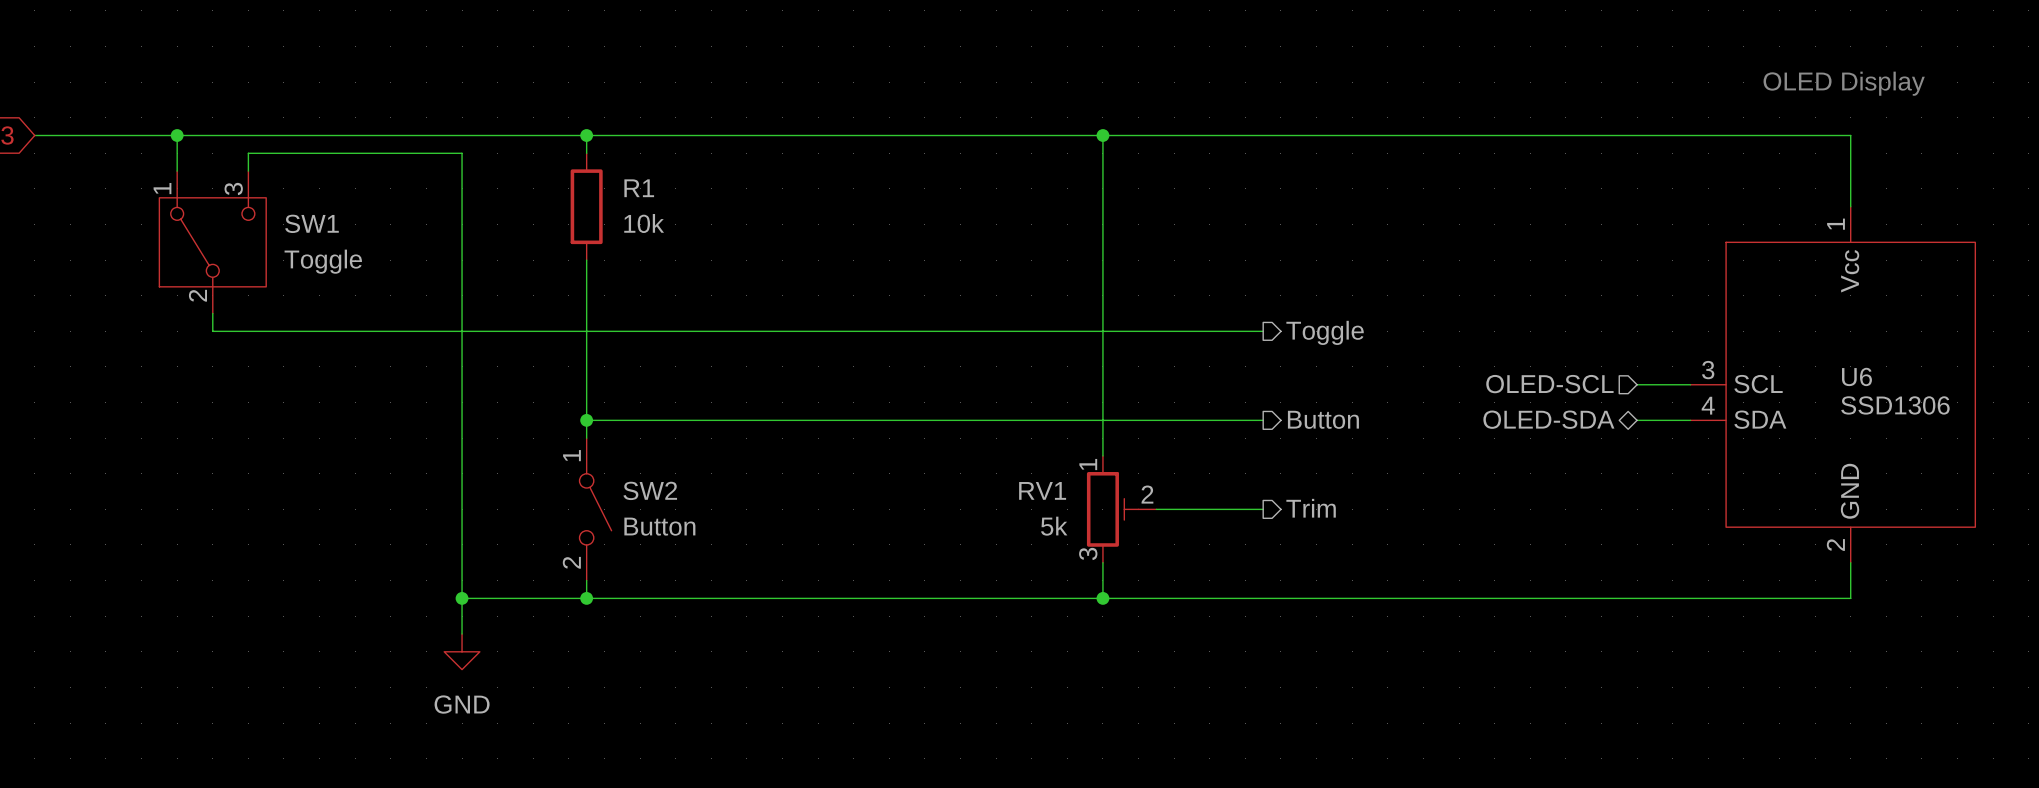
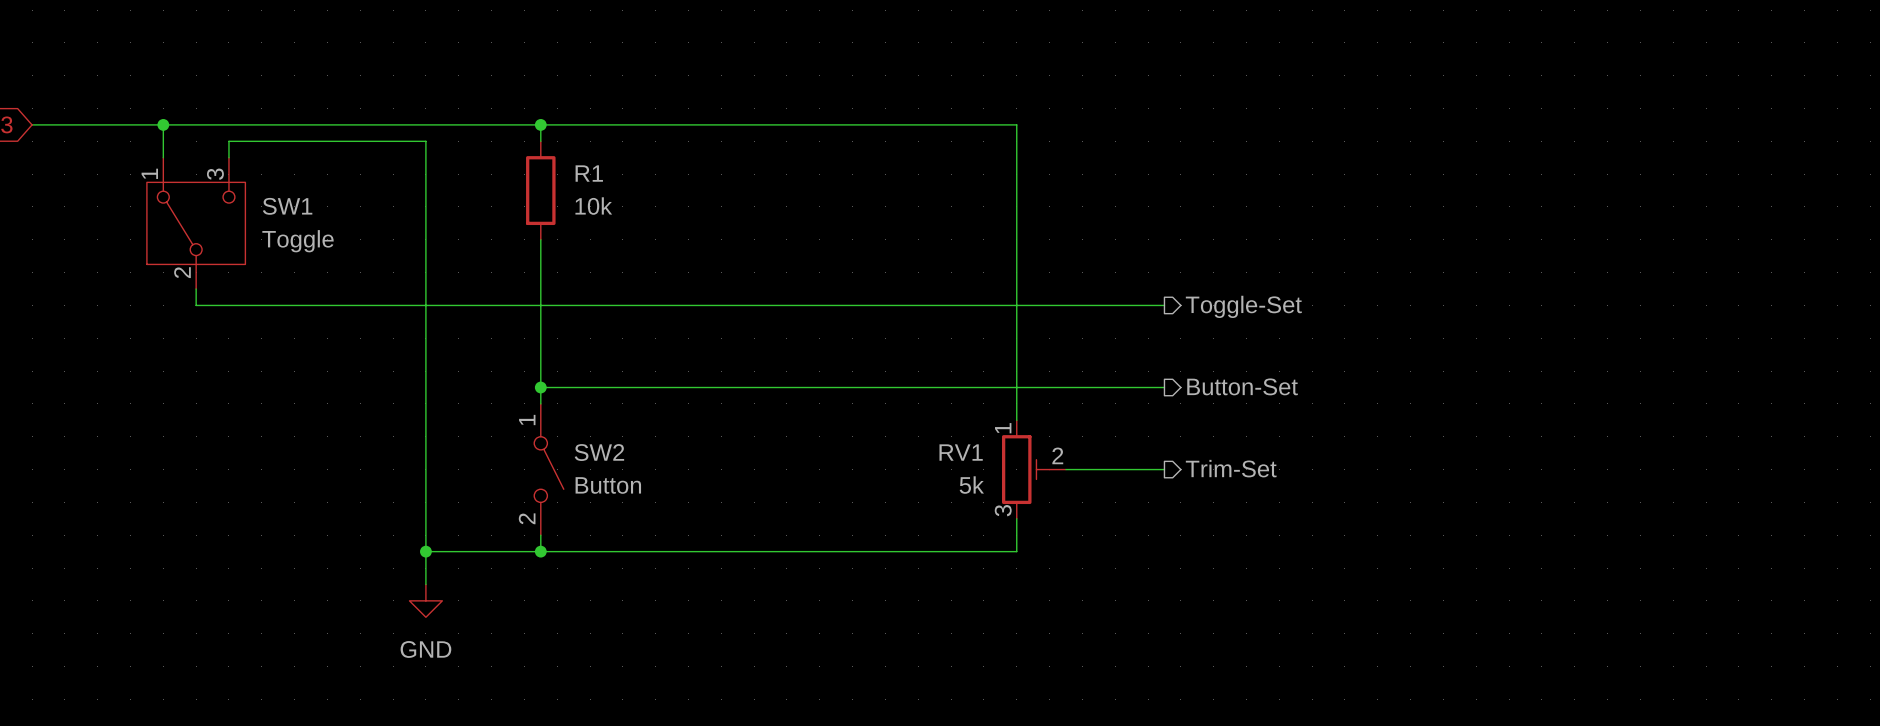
text: OLED Display (1844, 83) -> none
wire: (1102, 135) (1850, 135) (1850, 206) -> none
junction: (1102, 135) -> none
hierarchical label: Toggle (1325, 332) -> Toggle-Set (1243, 306)
hierarchical label: OLED-SCL (1549, 384) -> none
wire: (1637, 384) (1690, 384) -> none
U6: SSD1306 (1832, 384) -> none
hierarchical label: Button (1323, 419) -> Button-Set (1242, 386)
hierarchical label: OLED-SDA (1548, 419) -> none
wire: (1637, 420) (1690, 420) -> none
hierarchical label: Trim (1311, 508) -> Trim-Set (1231, 468)
wire: (1850, 562) (1850, 598) (1102, 598) -> none
junction: (1102, 598) -> none

